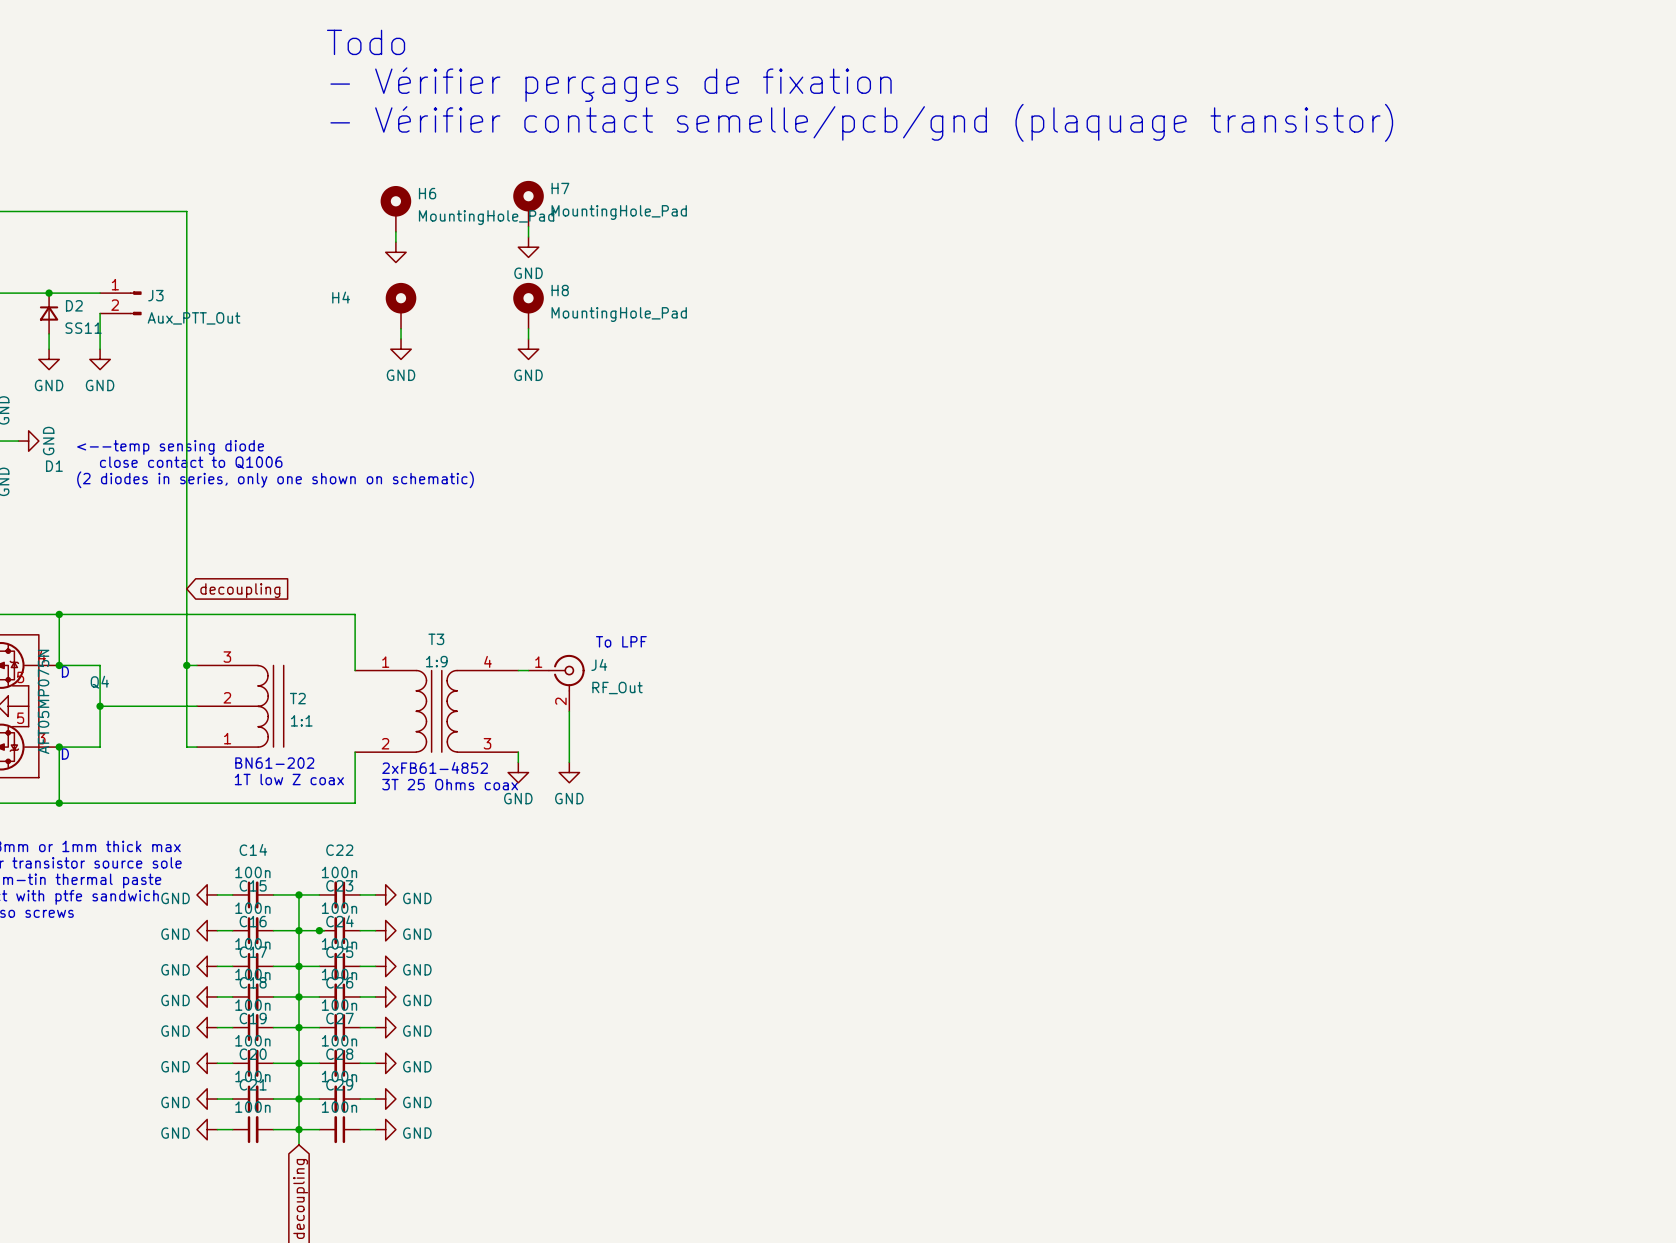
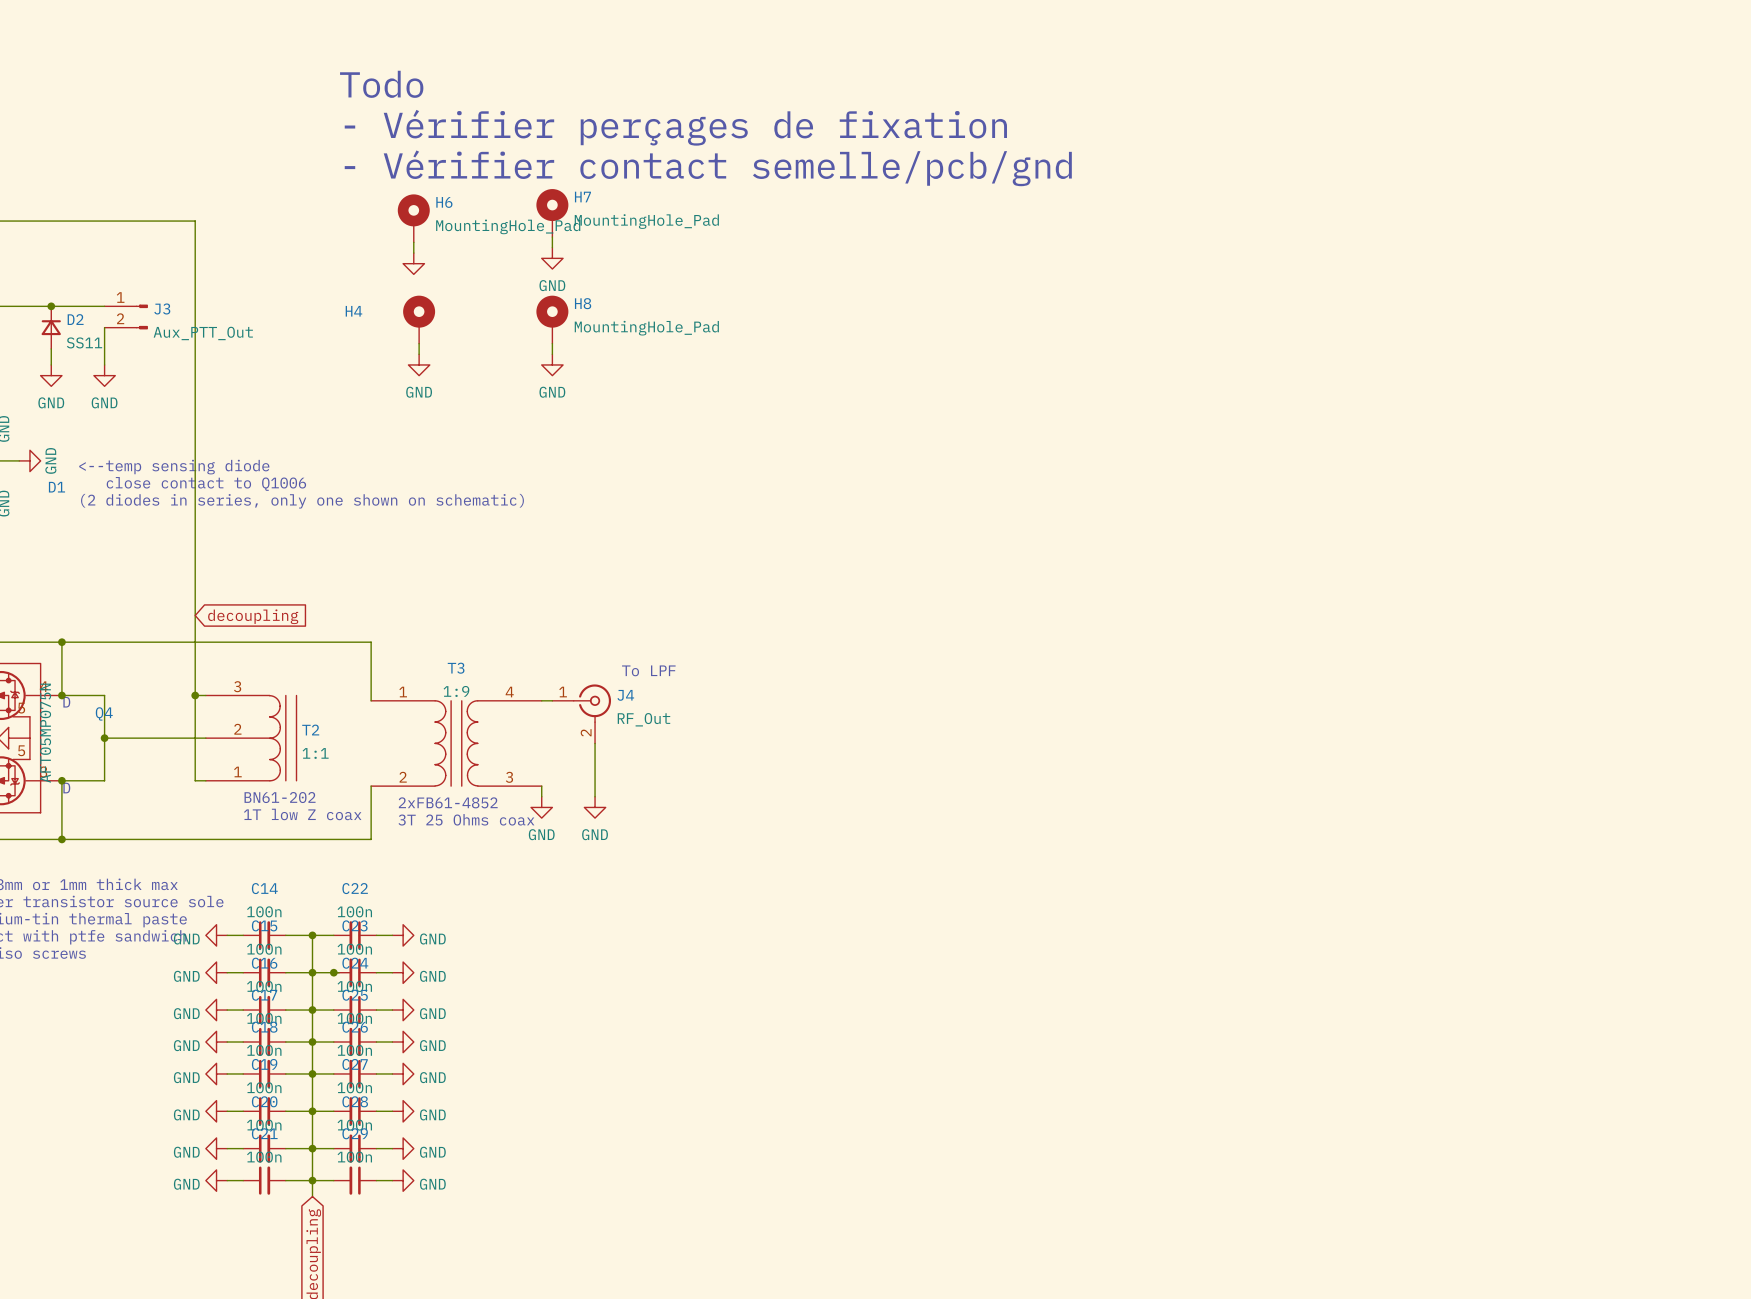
text: Todo (366, 42) -> none
text: - Vérifier perçages de fixation (611, 84) -> Todo (381, 84)
text: - Vérifier contact semelle/pcb/gnd (plaquage transistor) (861, 122) -> - Vérifier perçages de fixation (675, 127)
text: none -> - Vérifier contact semelle/pcb/gnd (708, 168)

